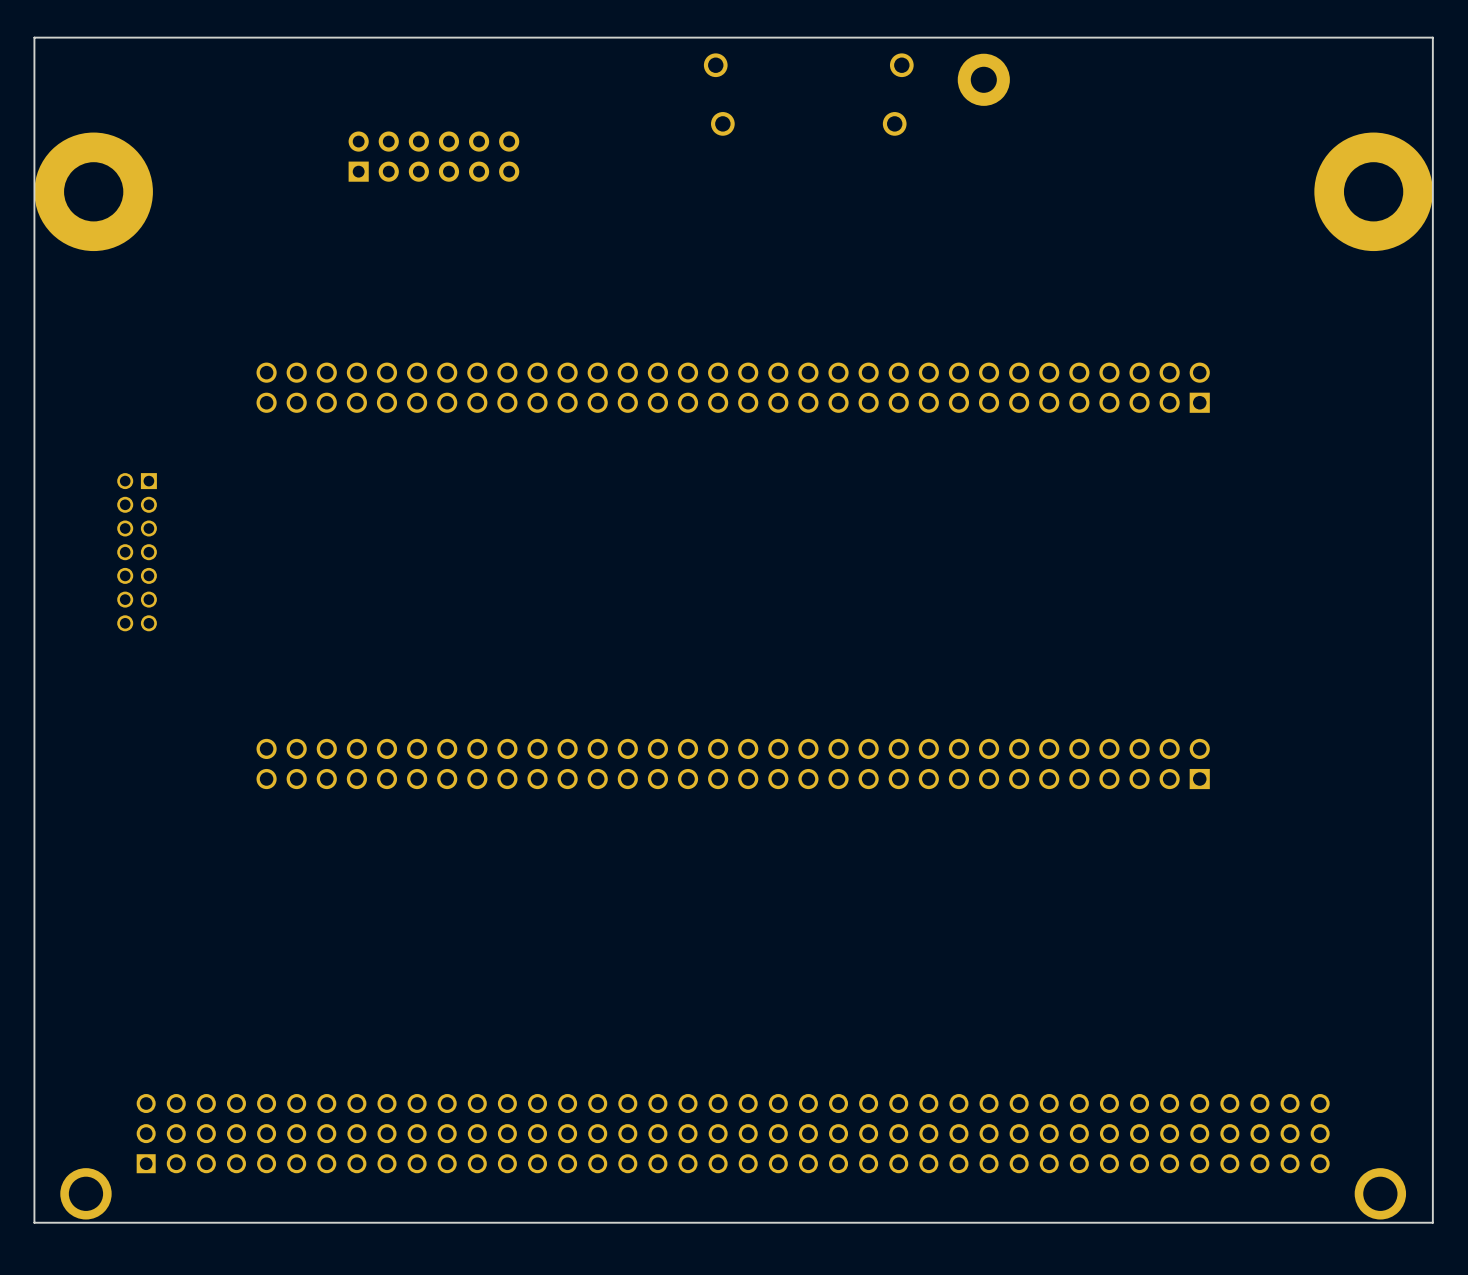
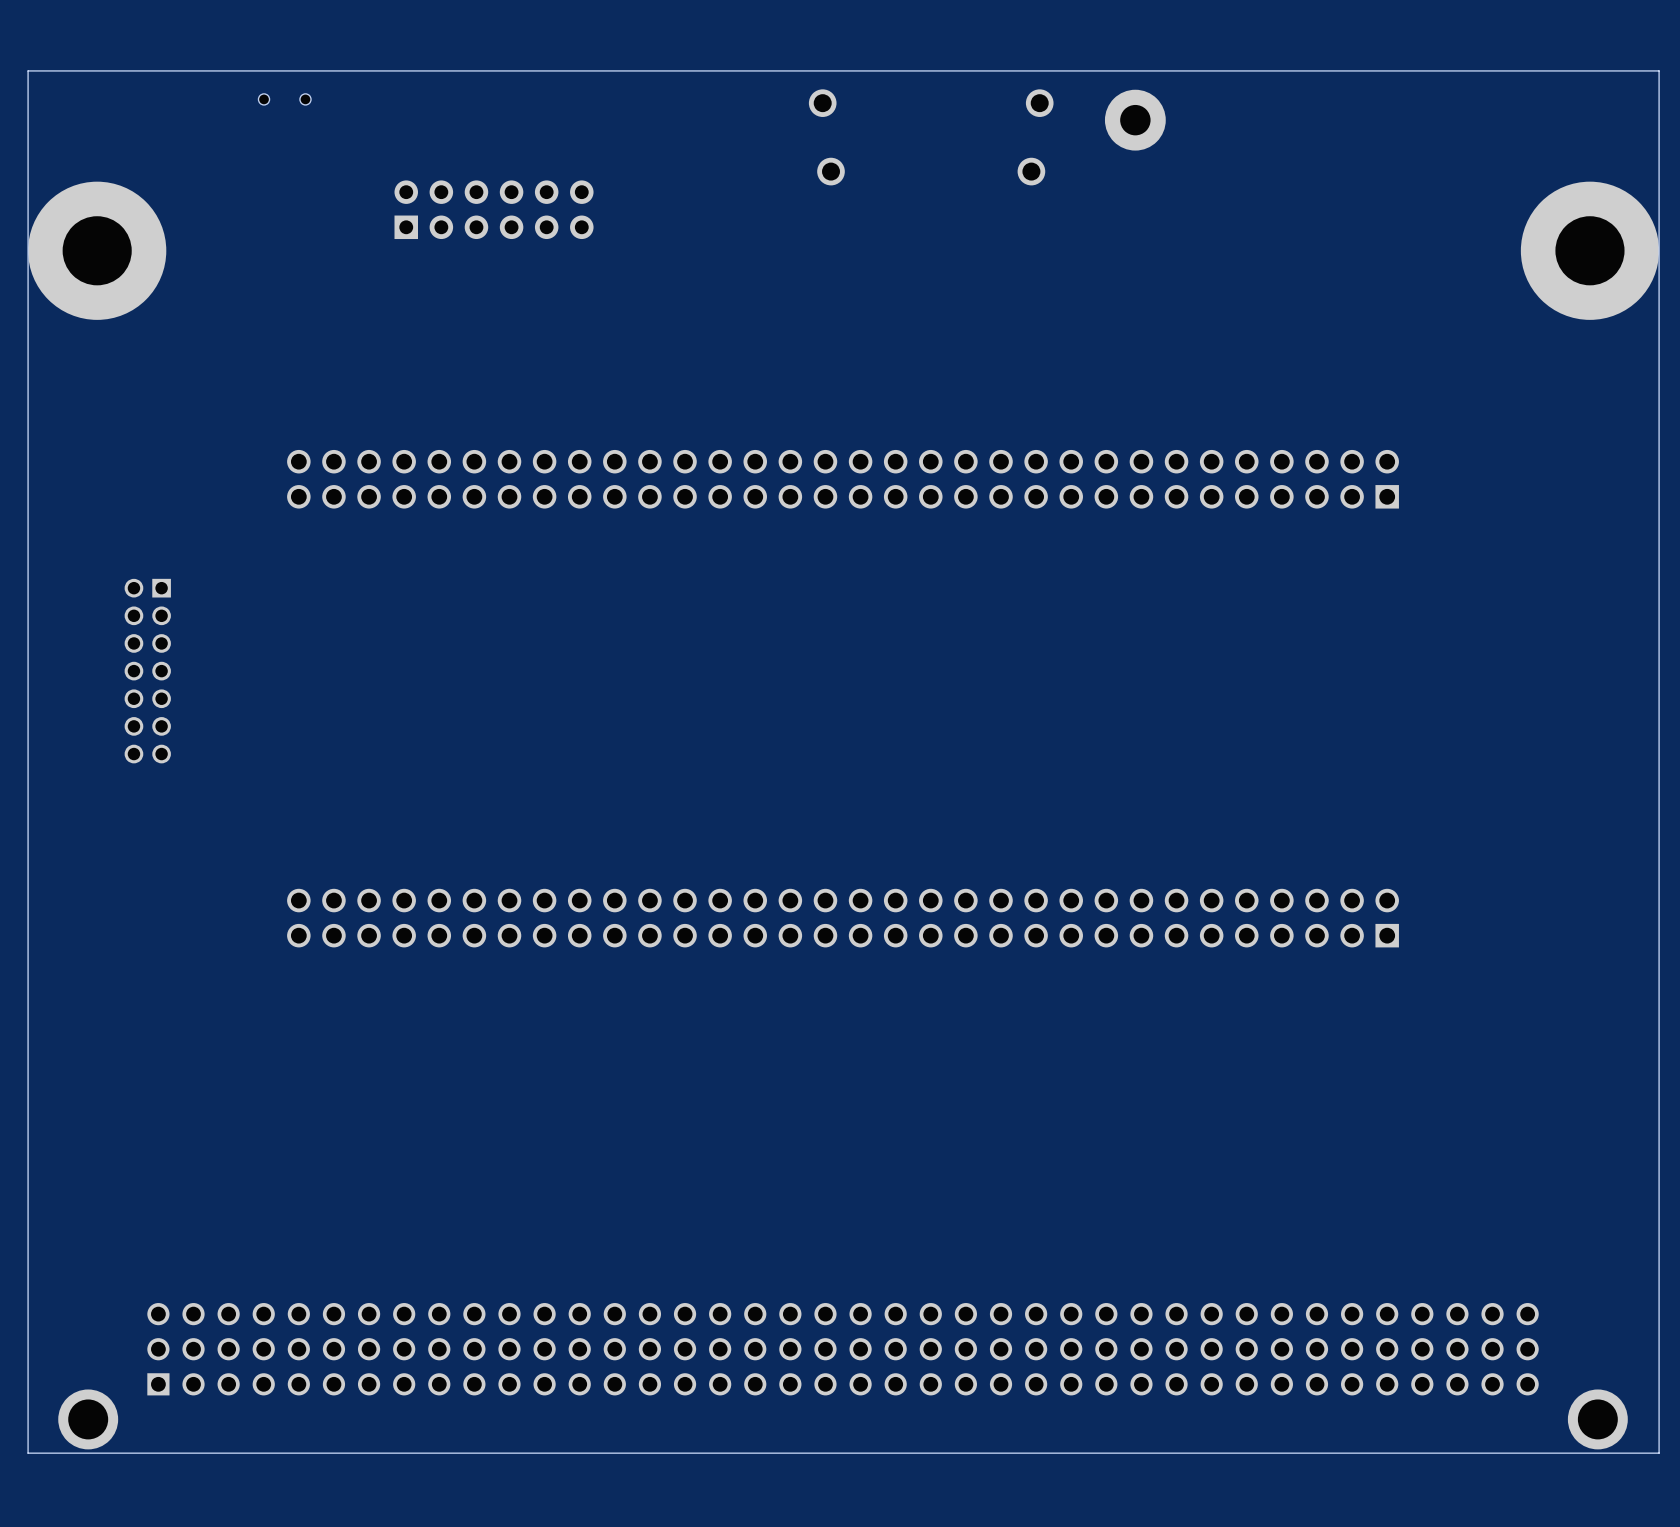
part: none -> (284, 99)

